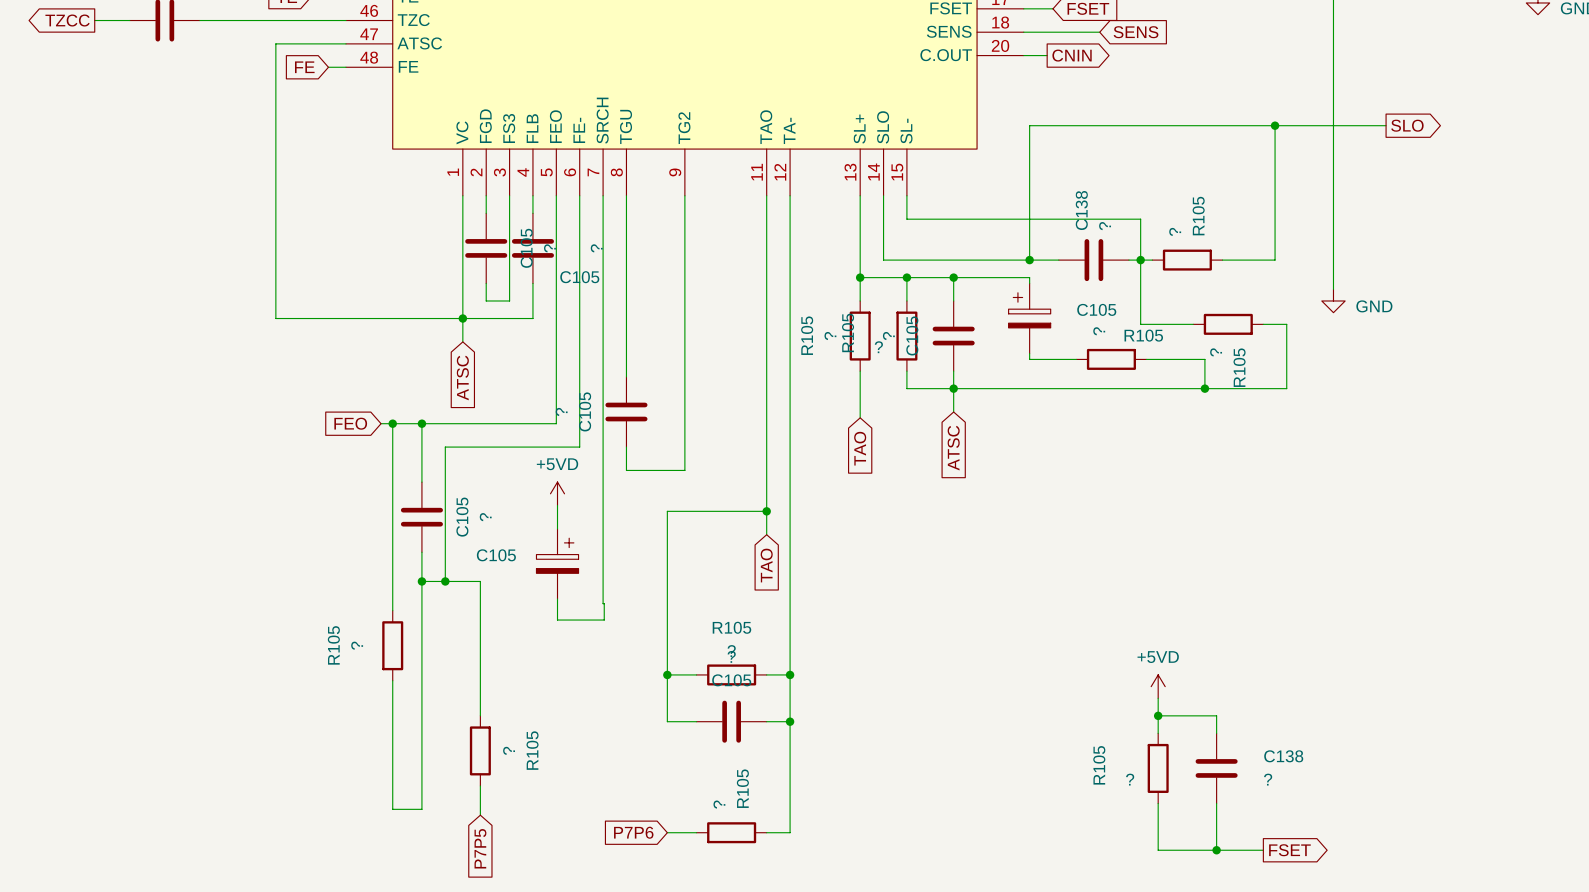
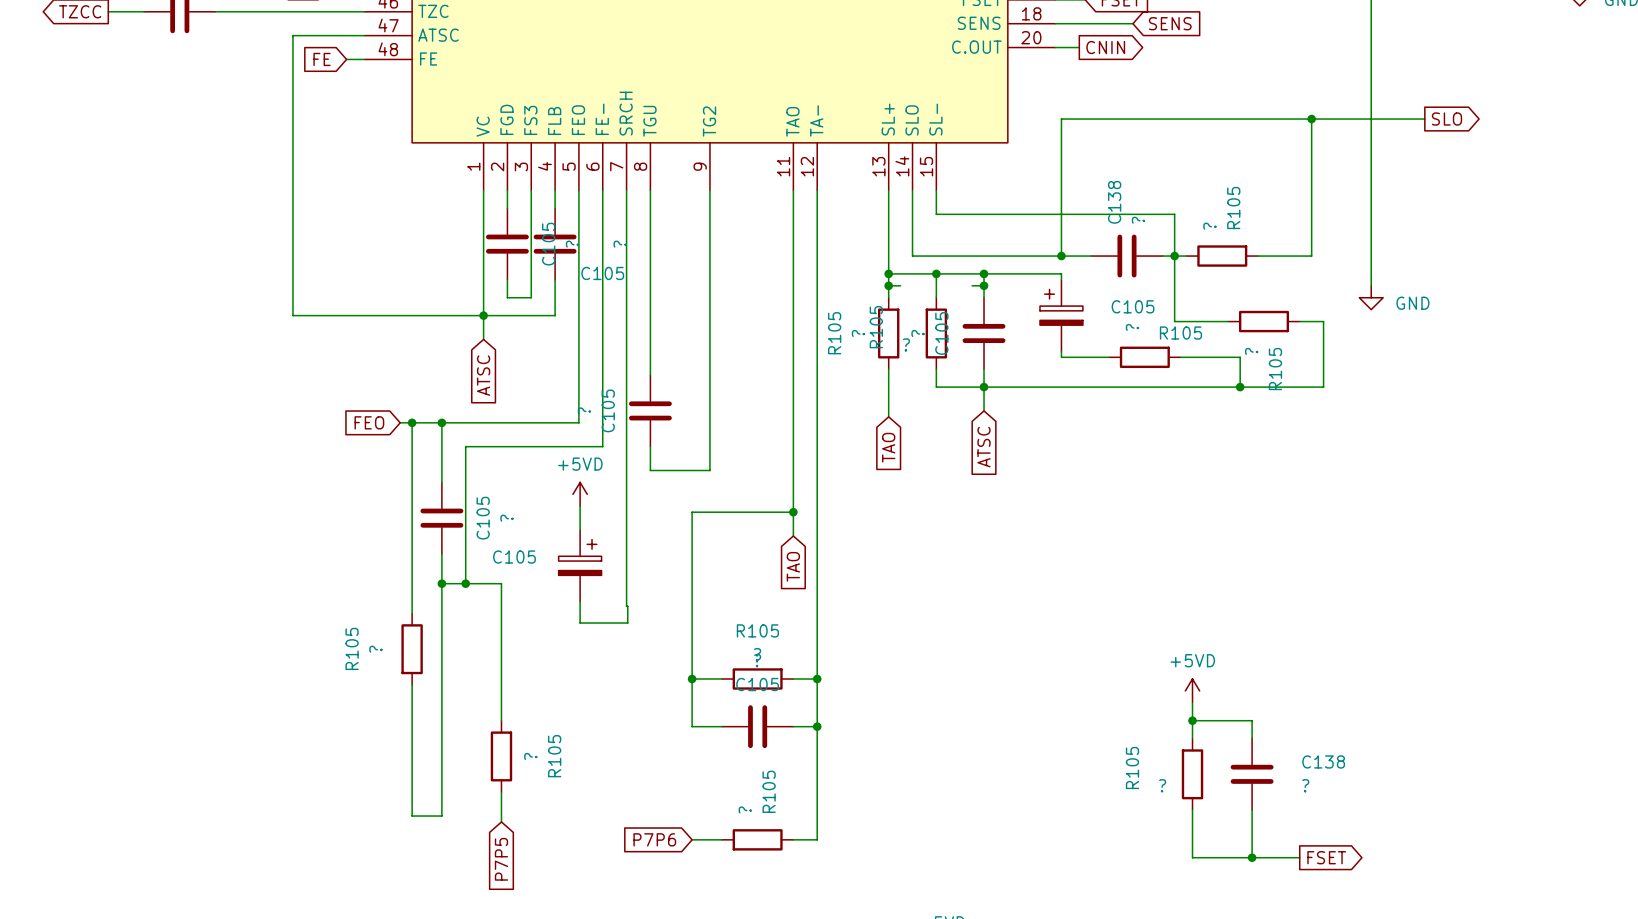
wire: none -> (888, 285) (900, 285)
junction: none -> (888, 285)
wire: none -> (972, 285) (984, 285)
junction: none -> (984, 285)

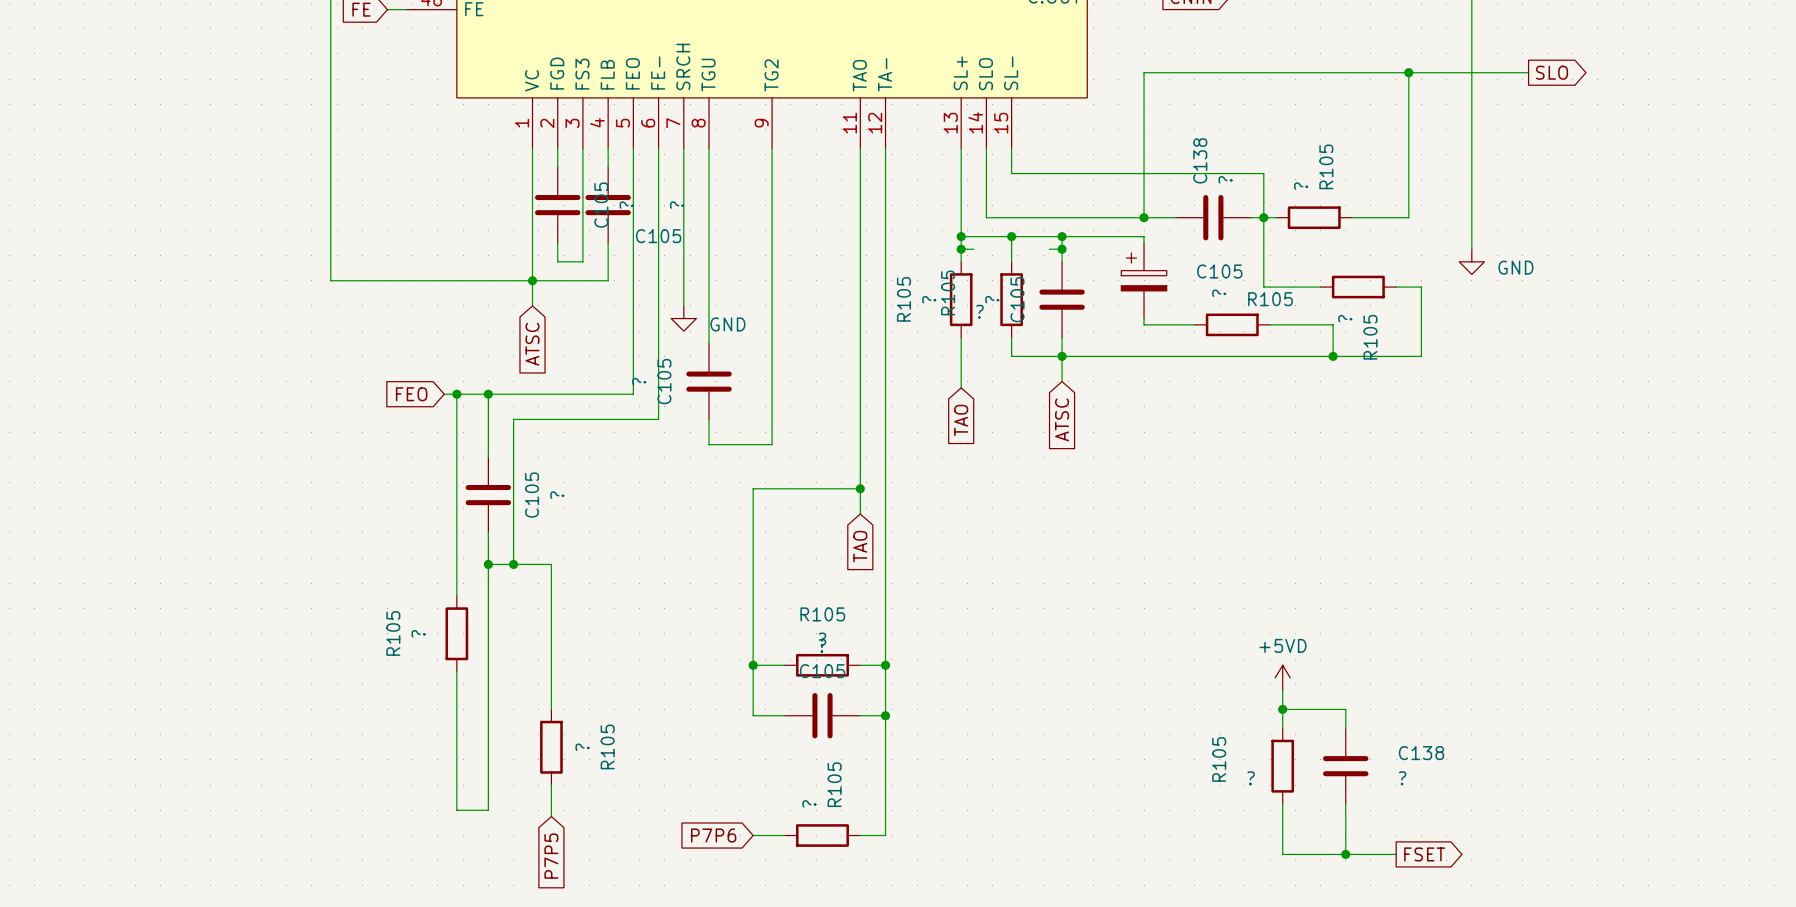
wire: (626, 339) (627, 623) (580, 623) (580, 601) -> none
power symbol: none -> GND (683, 318)
power symbol: +5VD (580, 494) -> none
wire: (580, 506) (580, 530) -> none
C105: (580, 565) -> none

